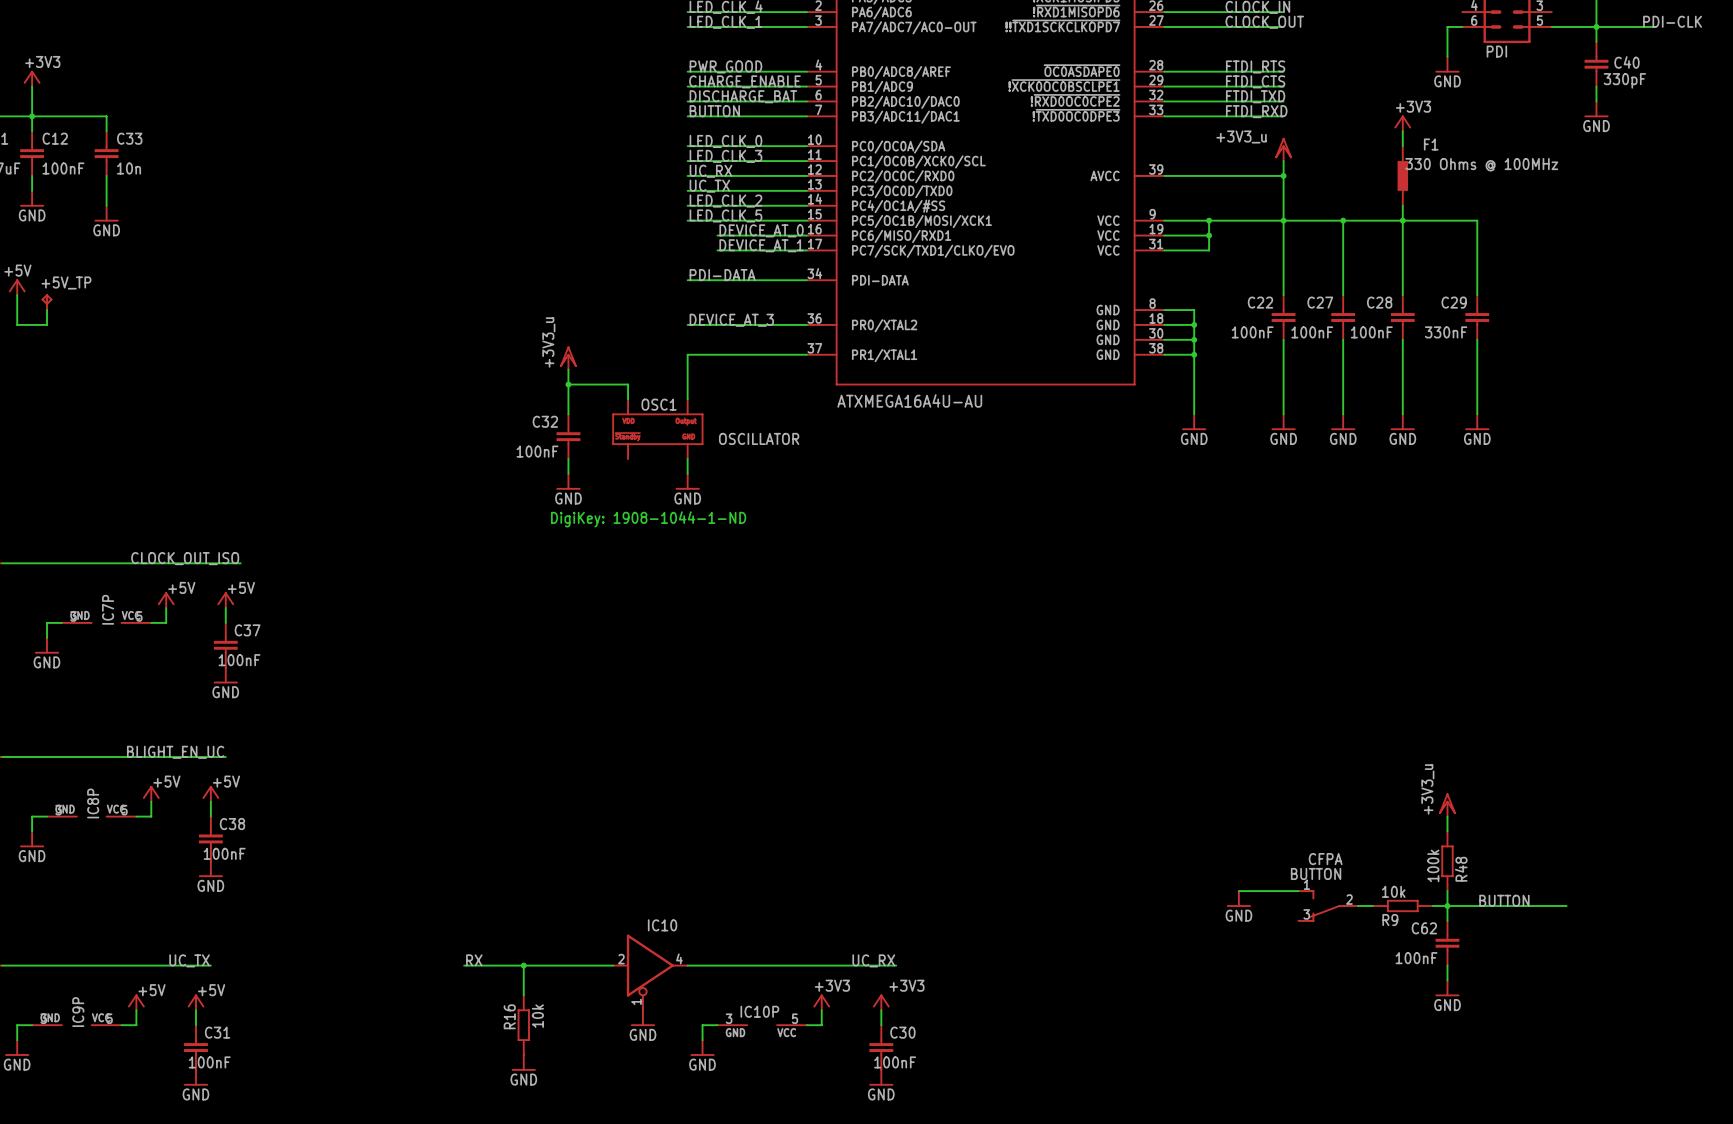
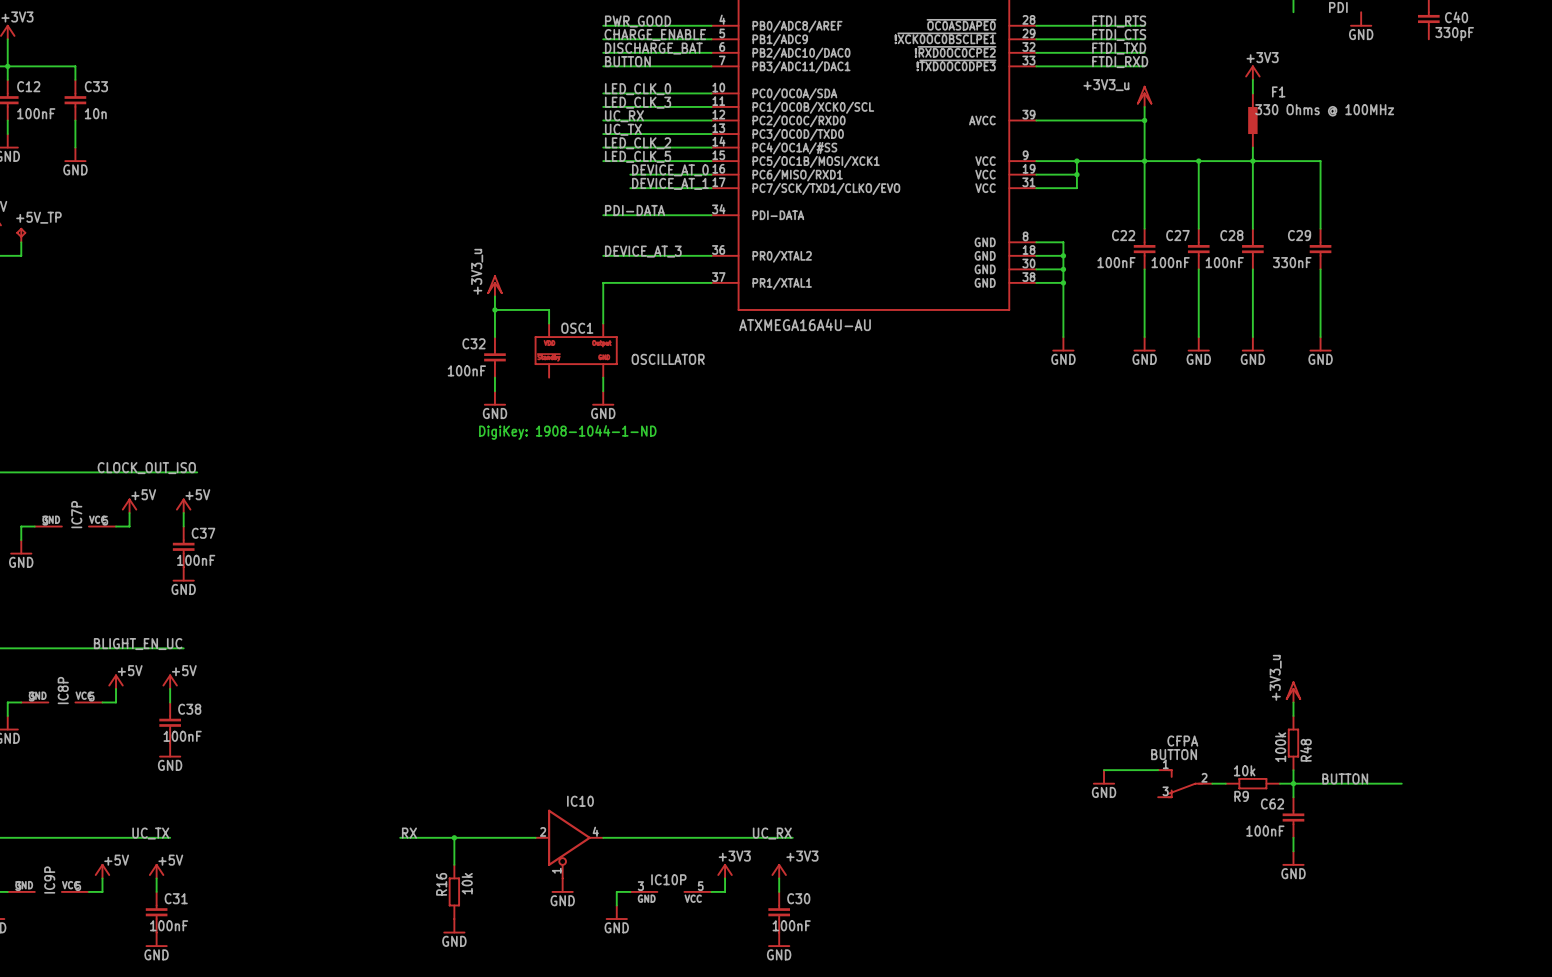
power symbol: GND (1447, 64) -> none
power symbol: none -> GND (1361, 19)
wire: (1596, 86) (1596, 101) -> none
power symbol: GND (1596, 109) -> none

